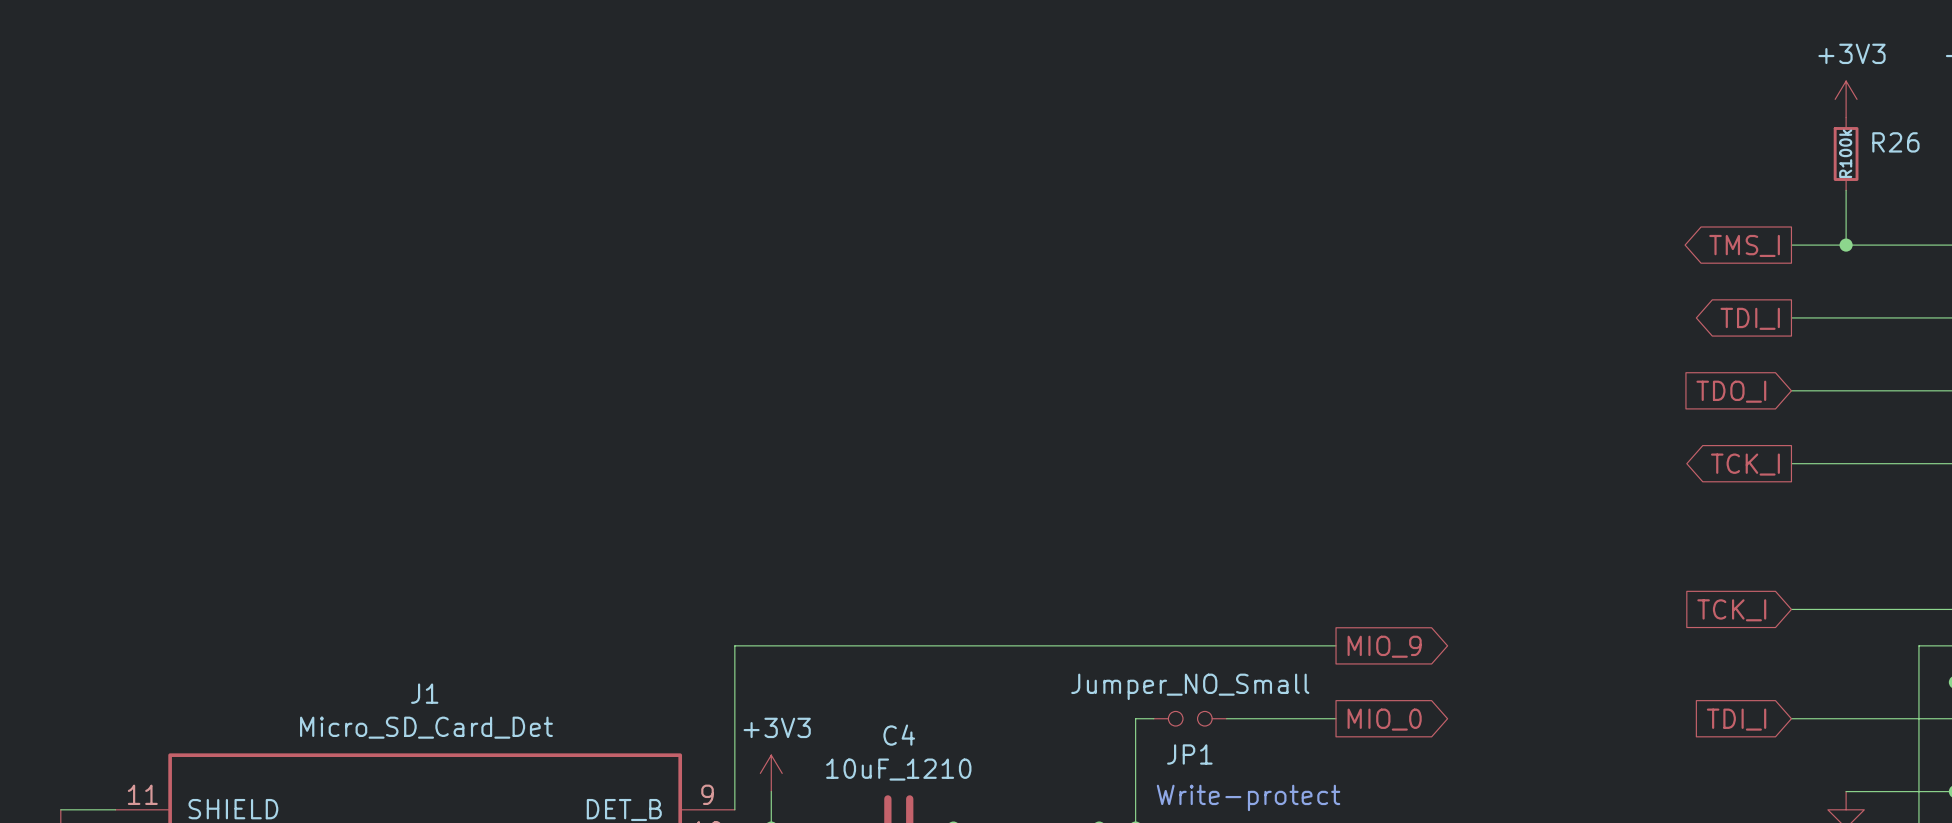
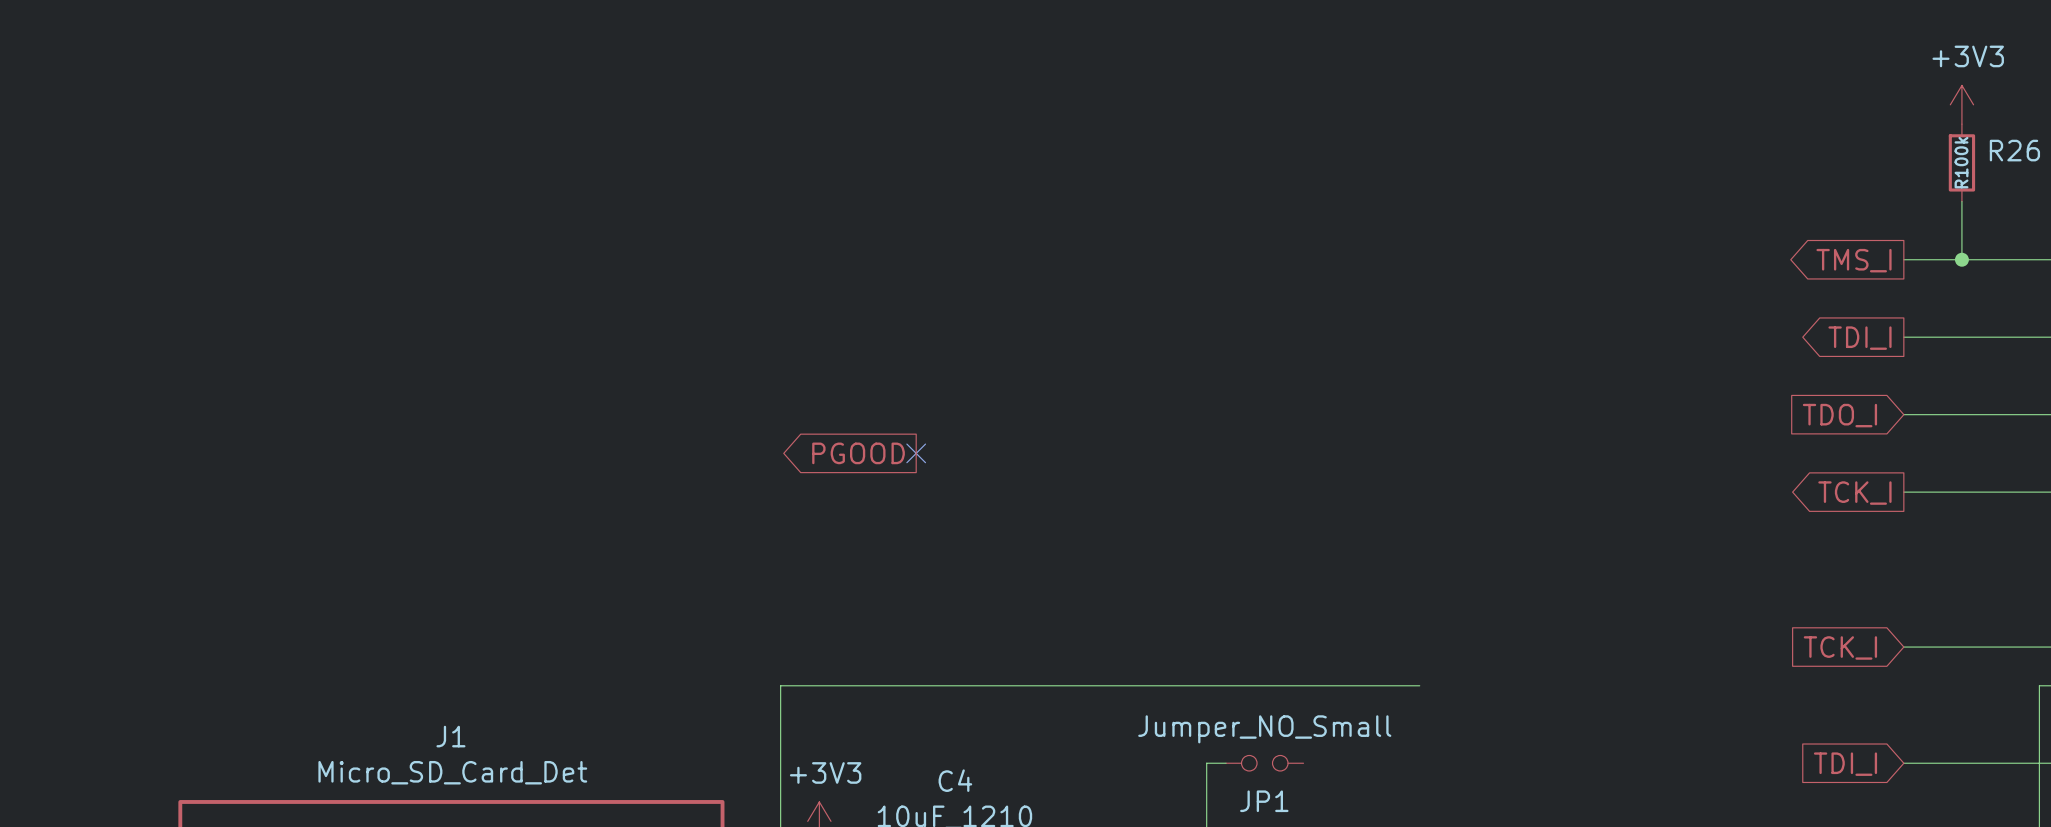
global label: none -> PGOOD (858, 453)
no-connect mark: none -> (916, 453)
global label: MIO_9 (1384, 646) -> none
wire: (1226, 718) (1336, 718) -> none
global label: MIO_0 (1384, 719) -> none

